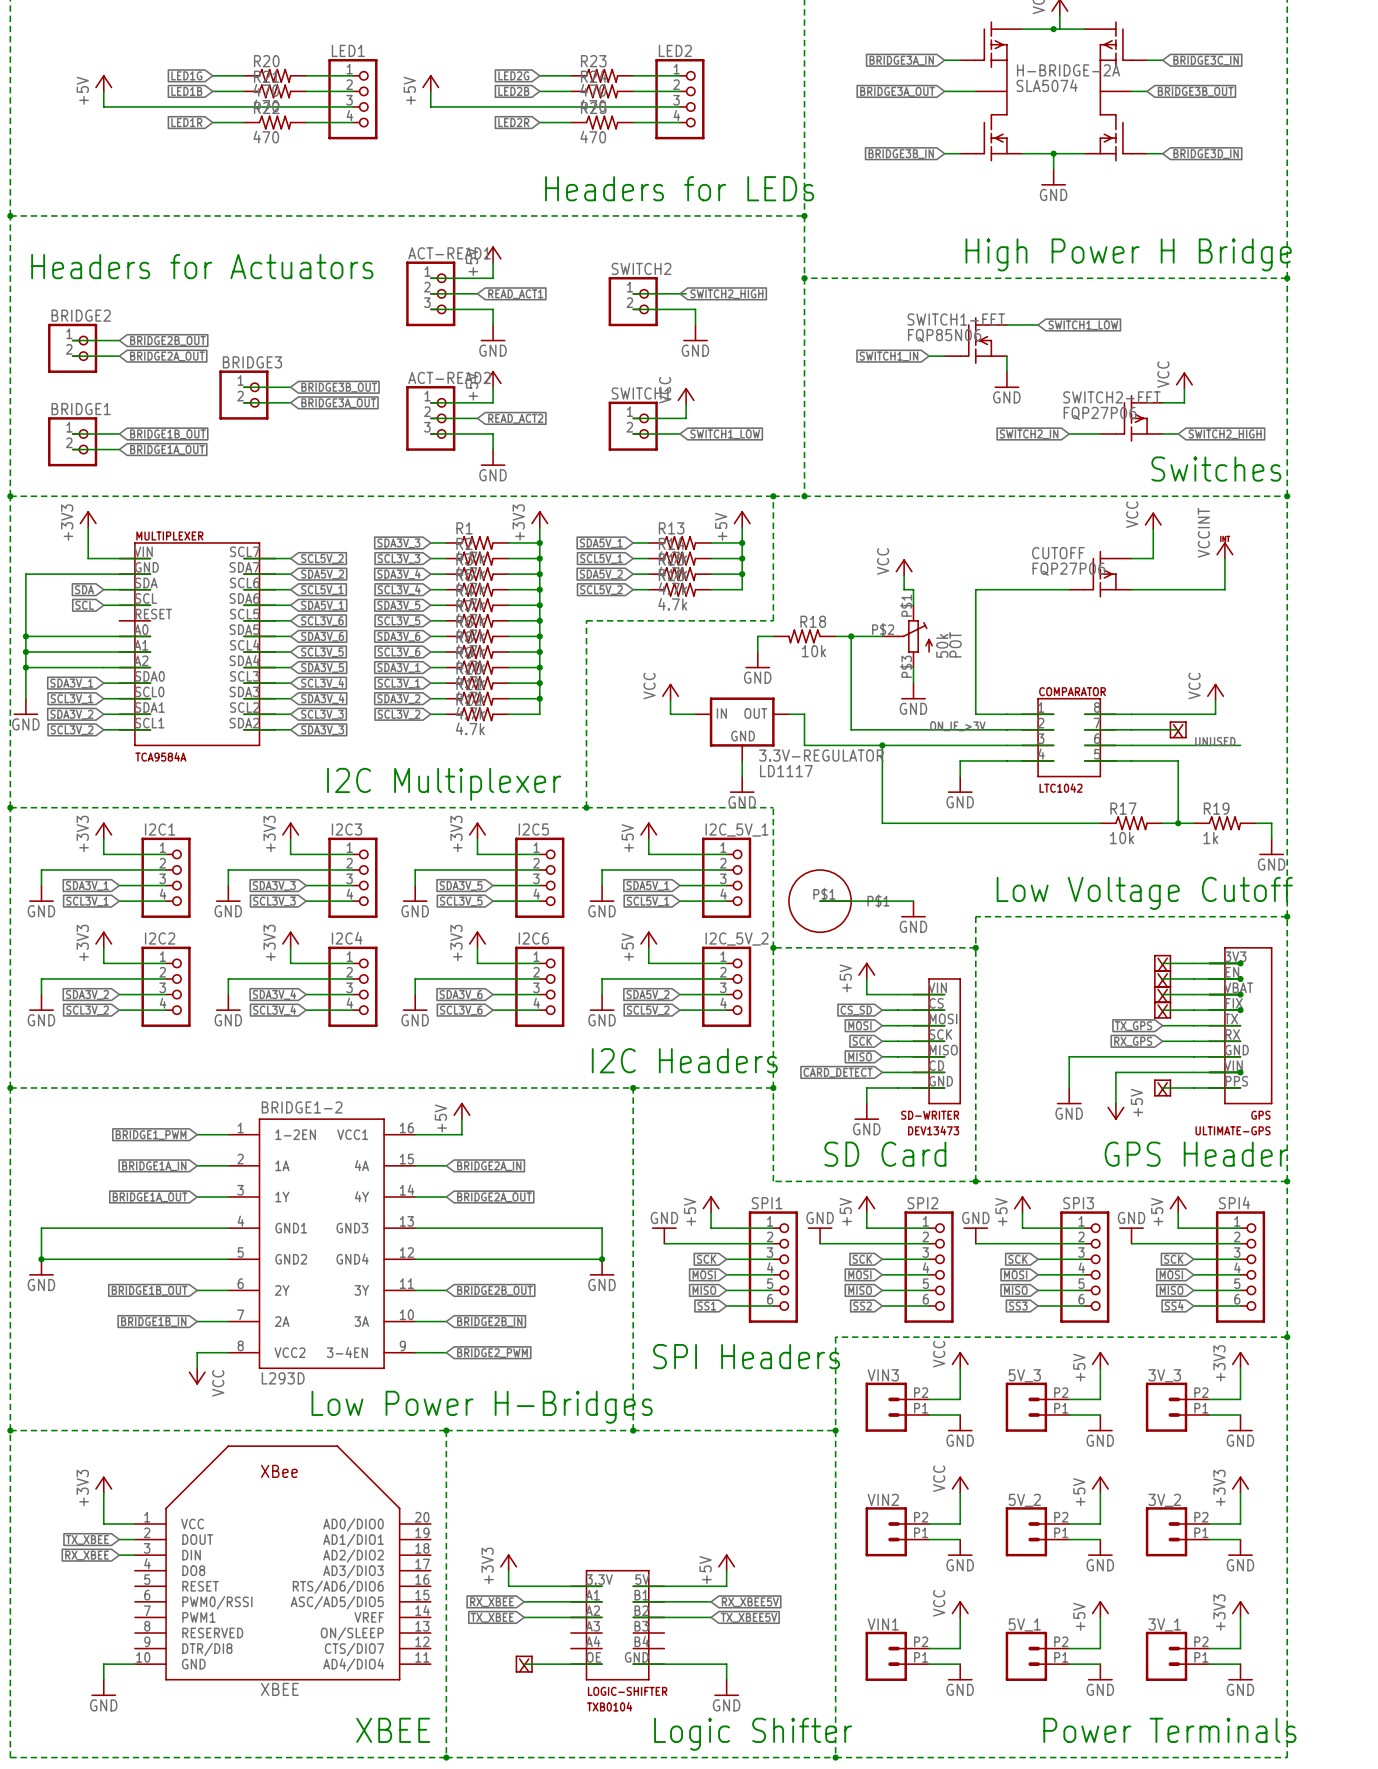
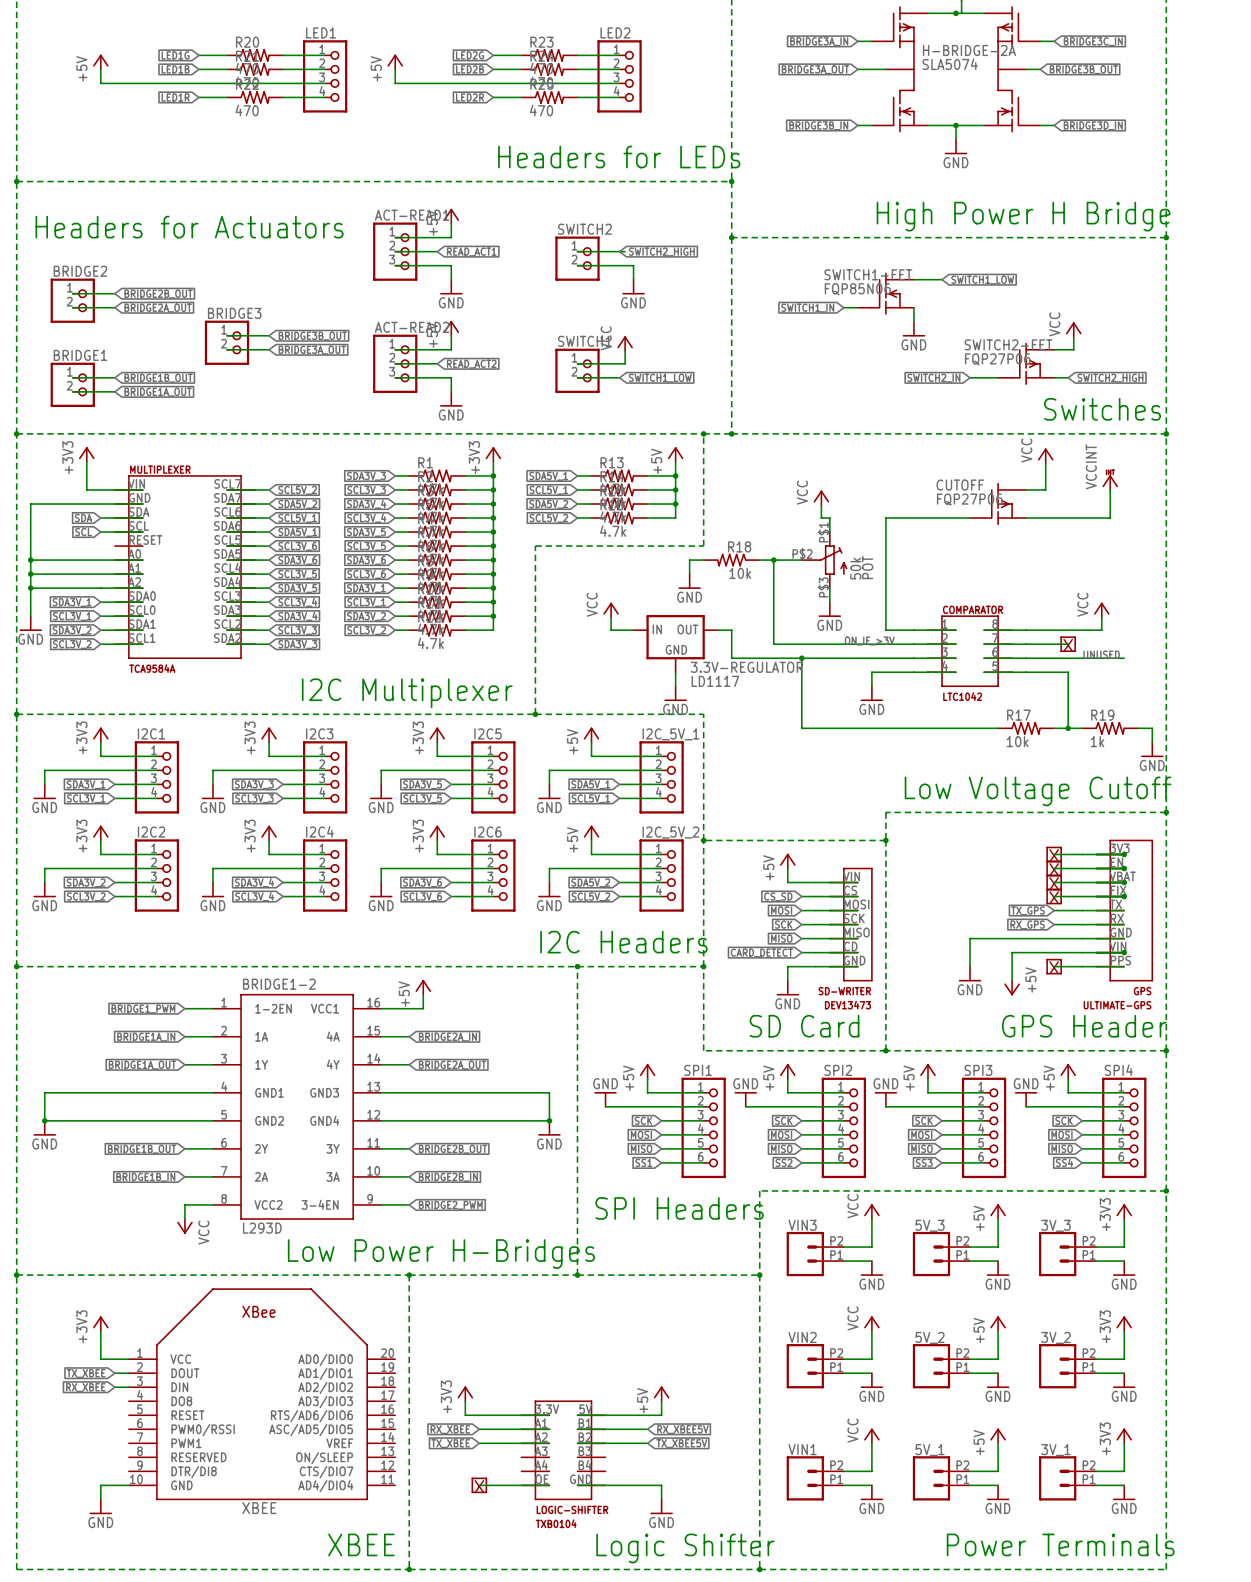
wire: (820, 901) (913, 901) -> none
part: (820, 901) -> none
power symbol: GND (913, 909) -> none

